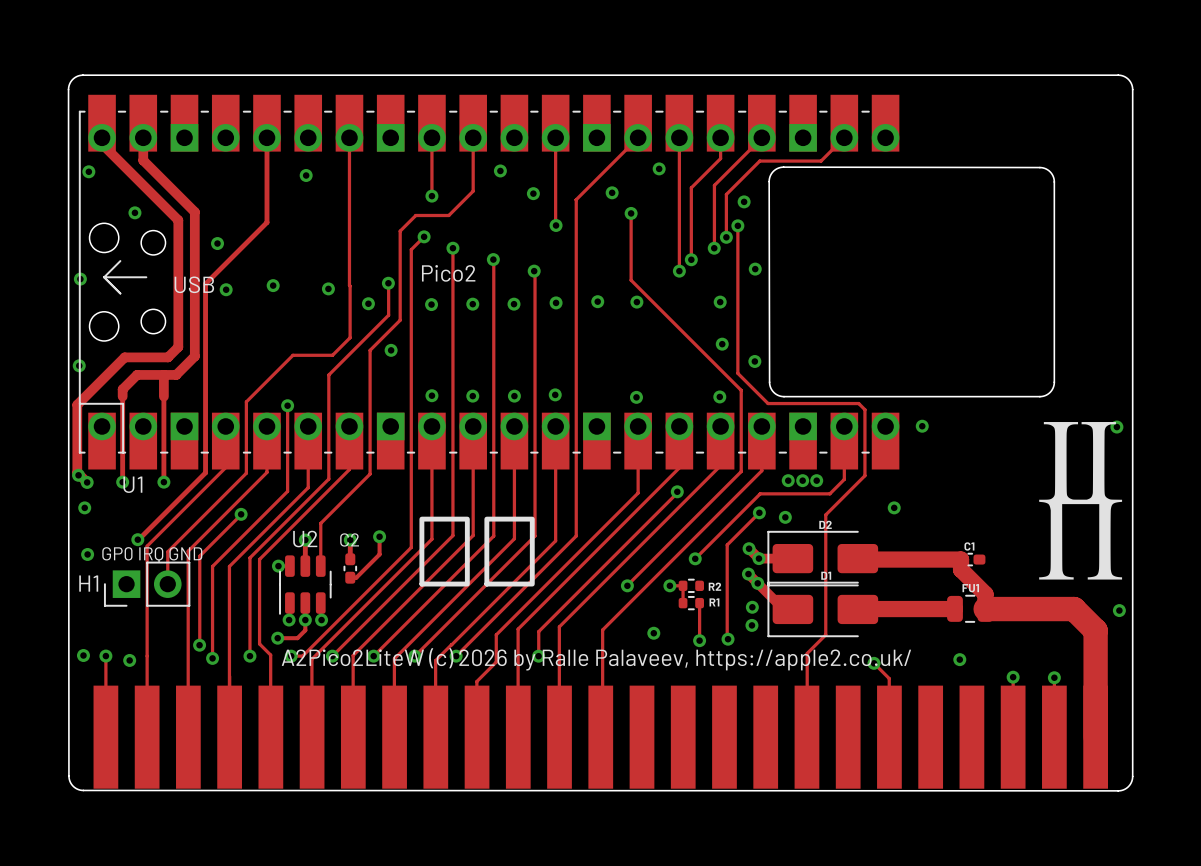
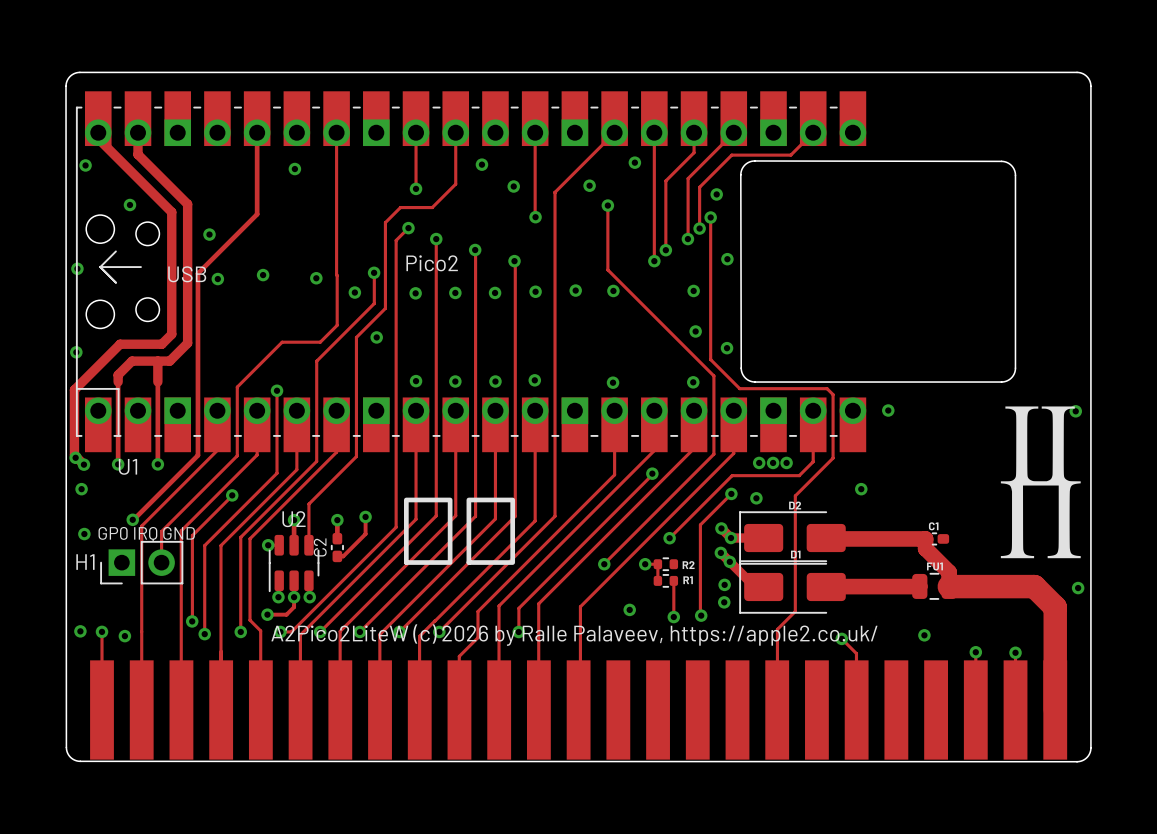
C2 name rotation: 0° (349, 539) -> 90° counterclockwise (320, 547)

